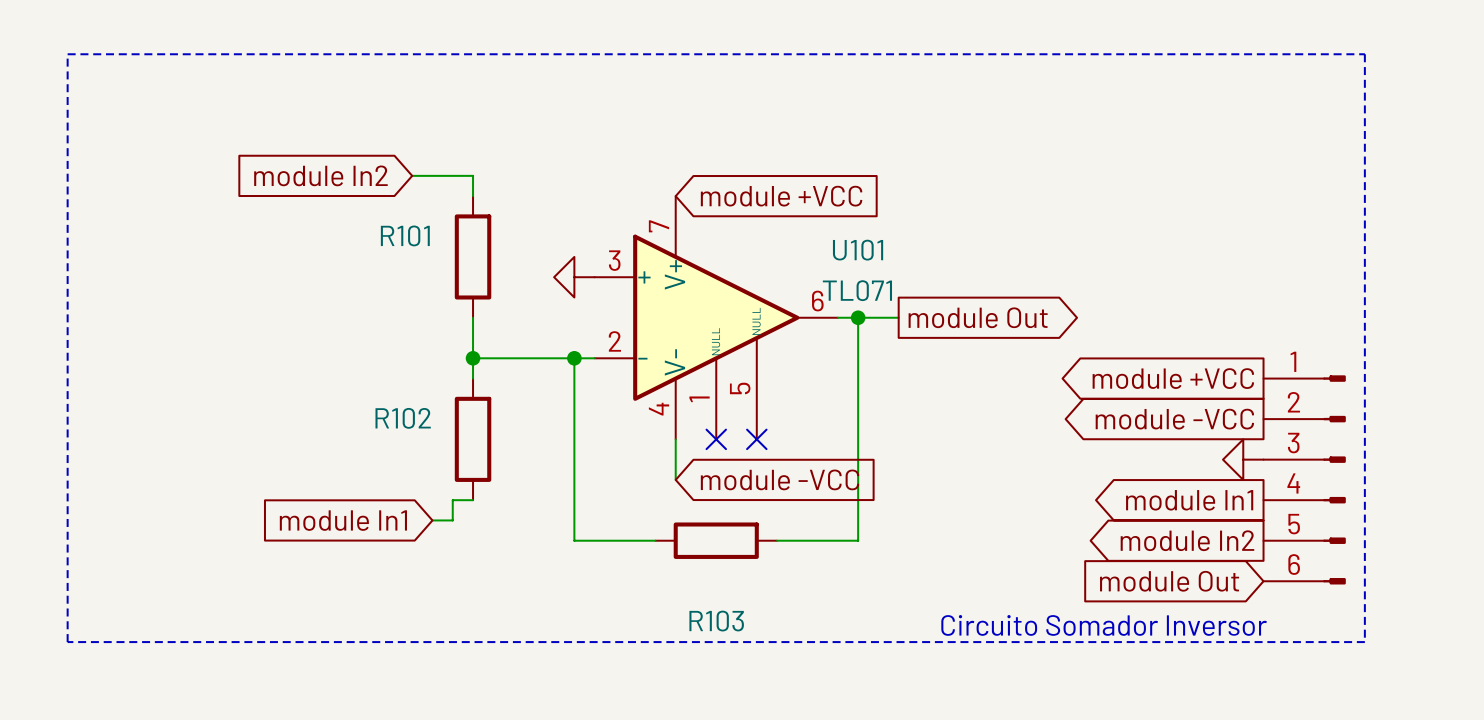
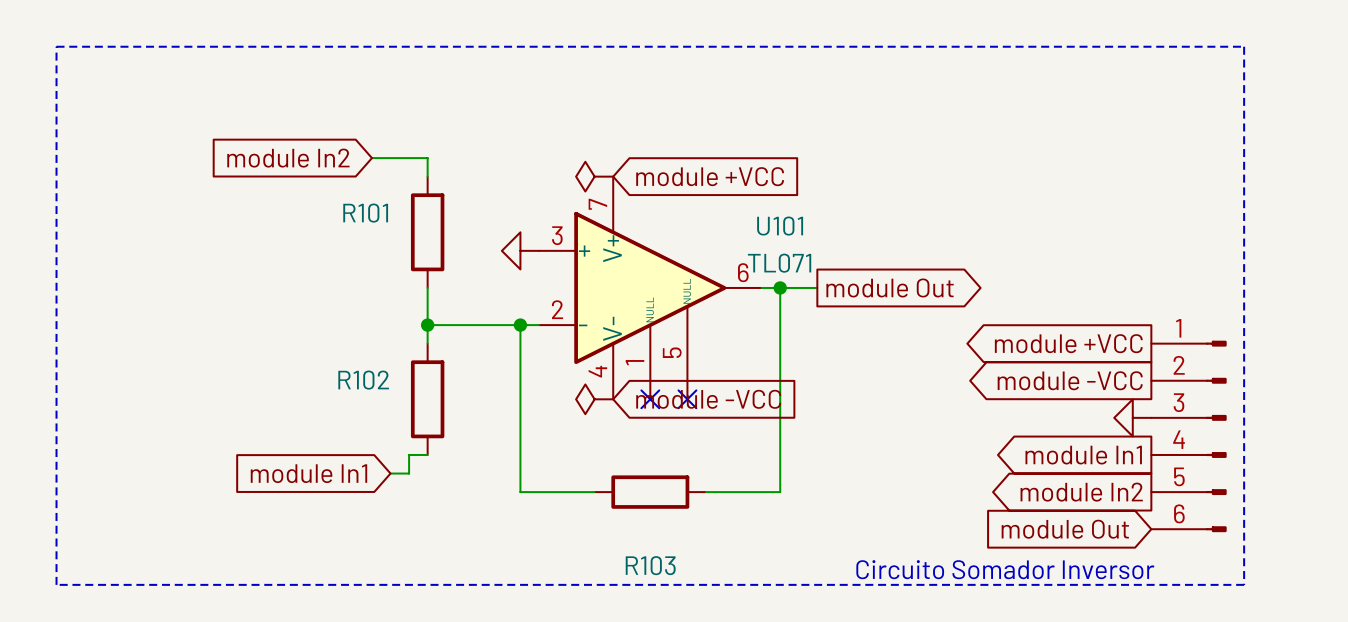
power symbol: none -> (594, 176)
power symbol: none -> (594, 399)
wire: (675, 439) (675, 479) -> none
global label position: module -VCC (780, 479) -> module -VCC (708, 399)

